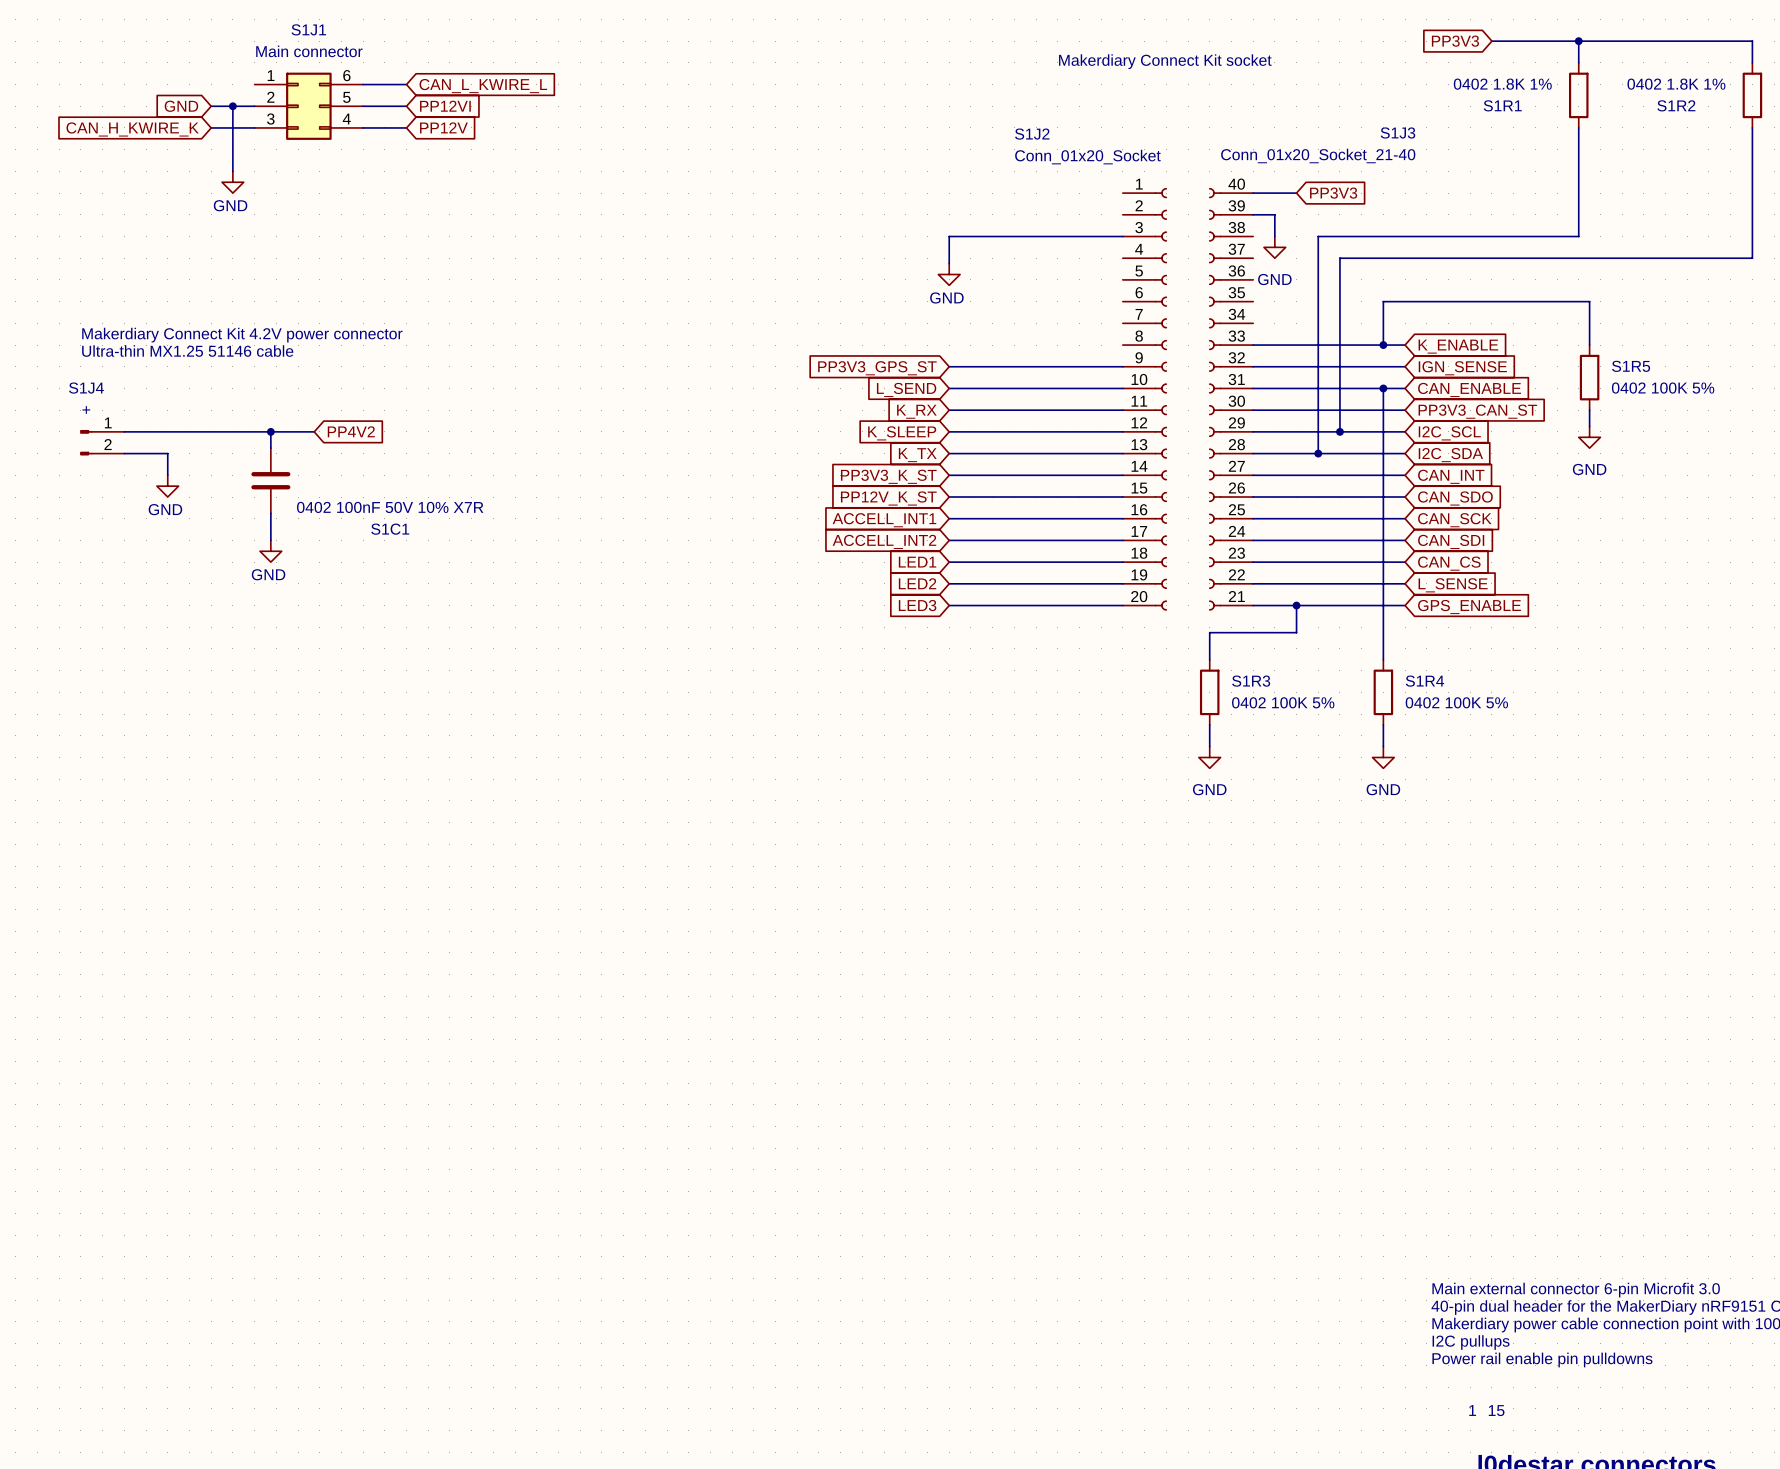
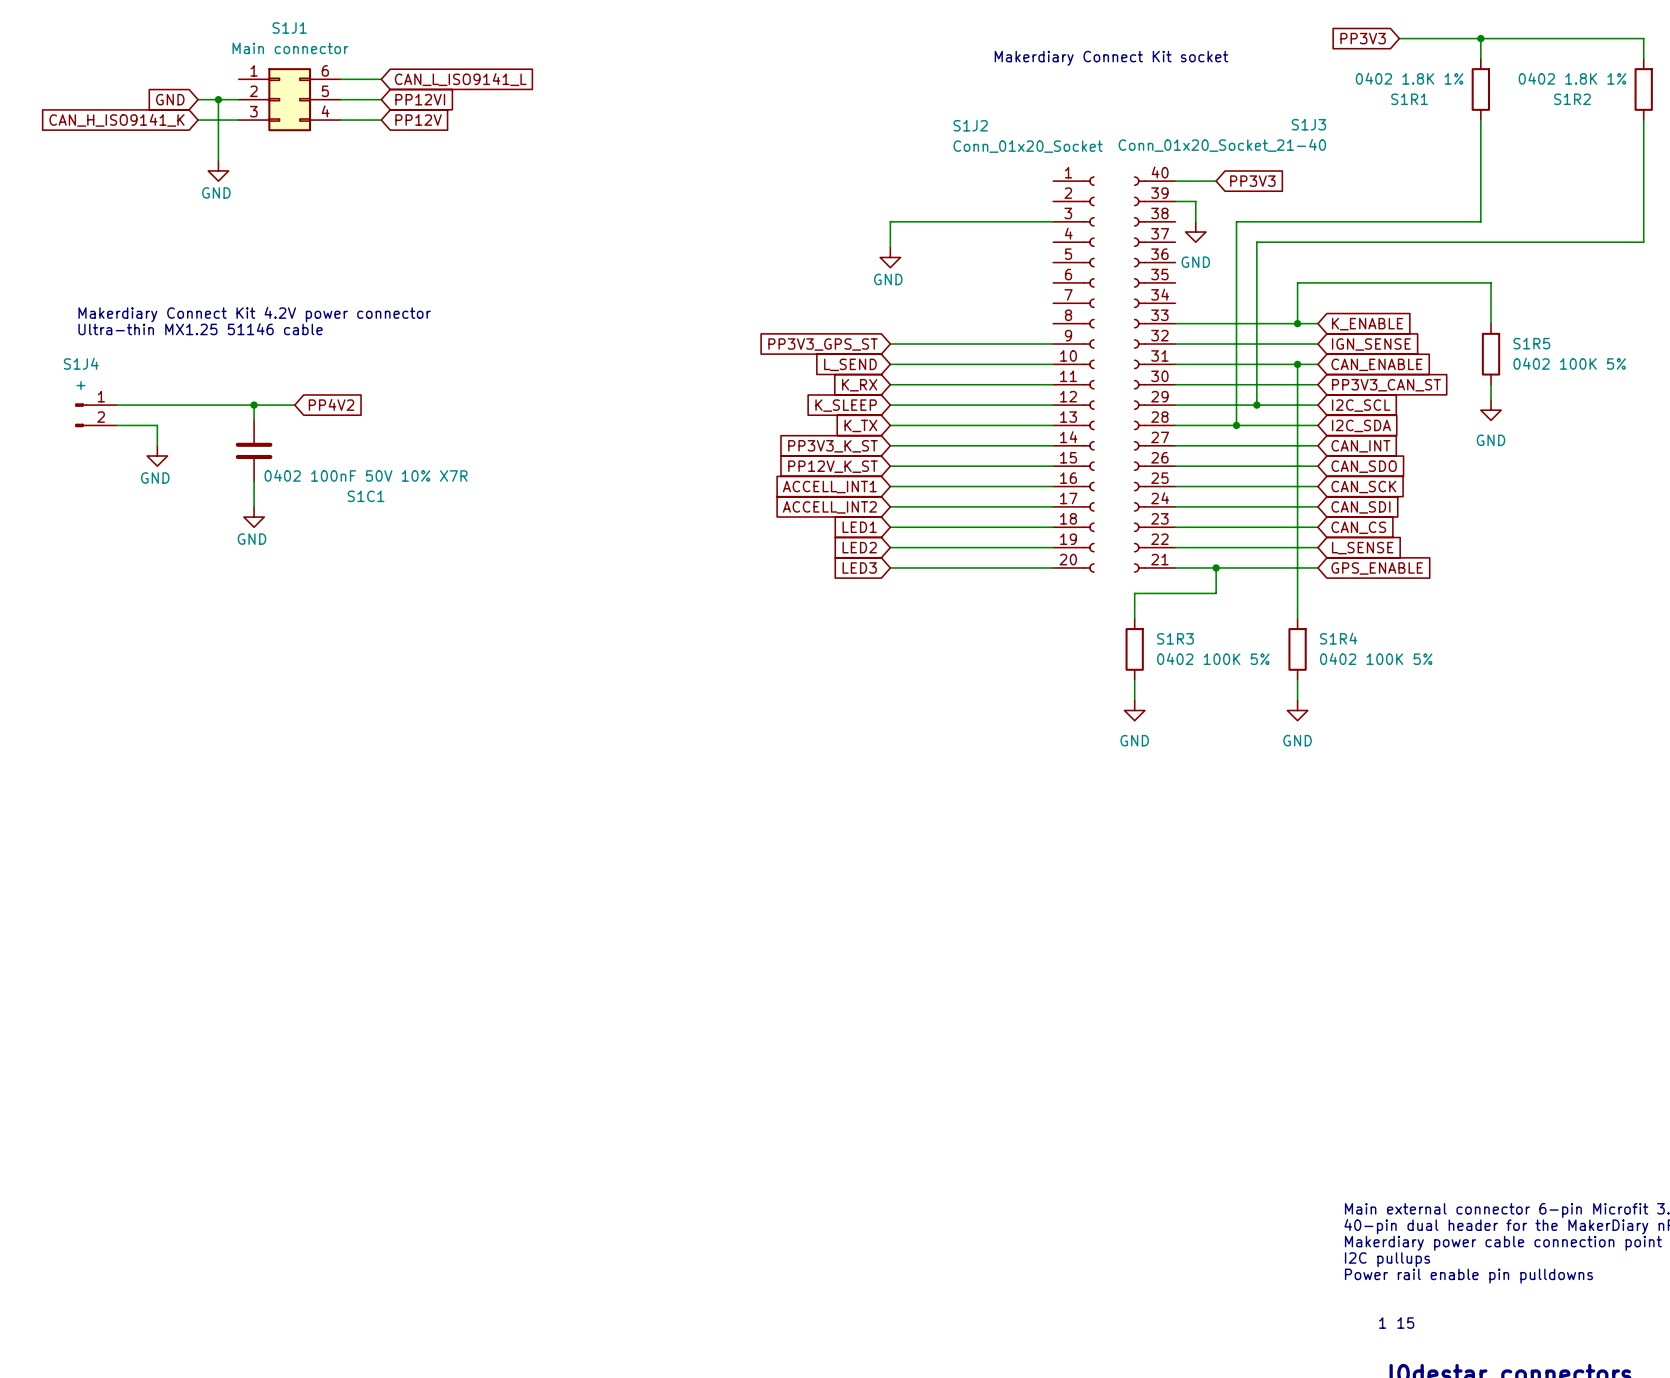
global label: CAN_L_KWIRE_L (483, 86) -> CAN_L_ISO9141_L (460, 79)
global label: CAN_H_KWIRE_K (132, 129) -> CAN_H_ISO9141_K (116, 120)

